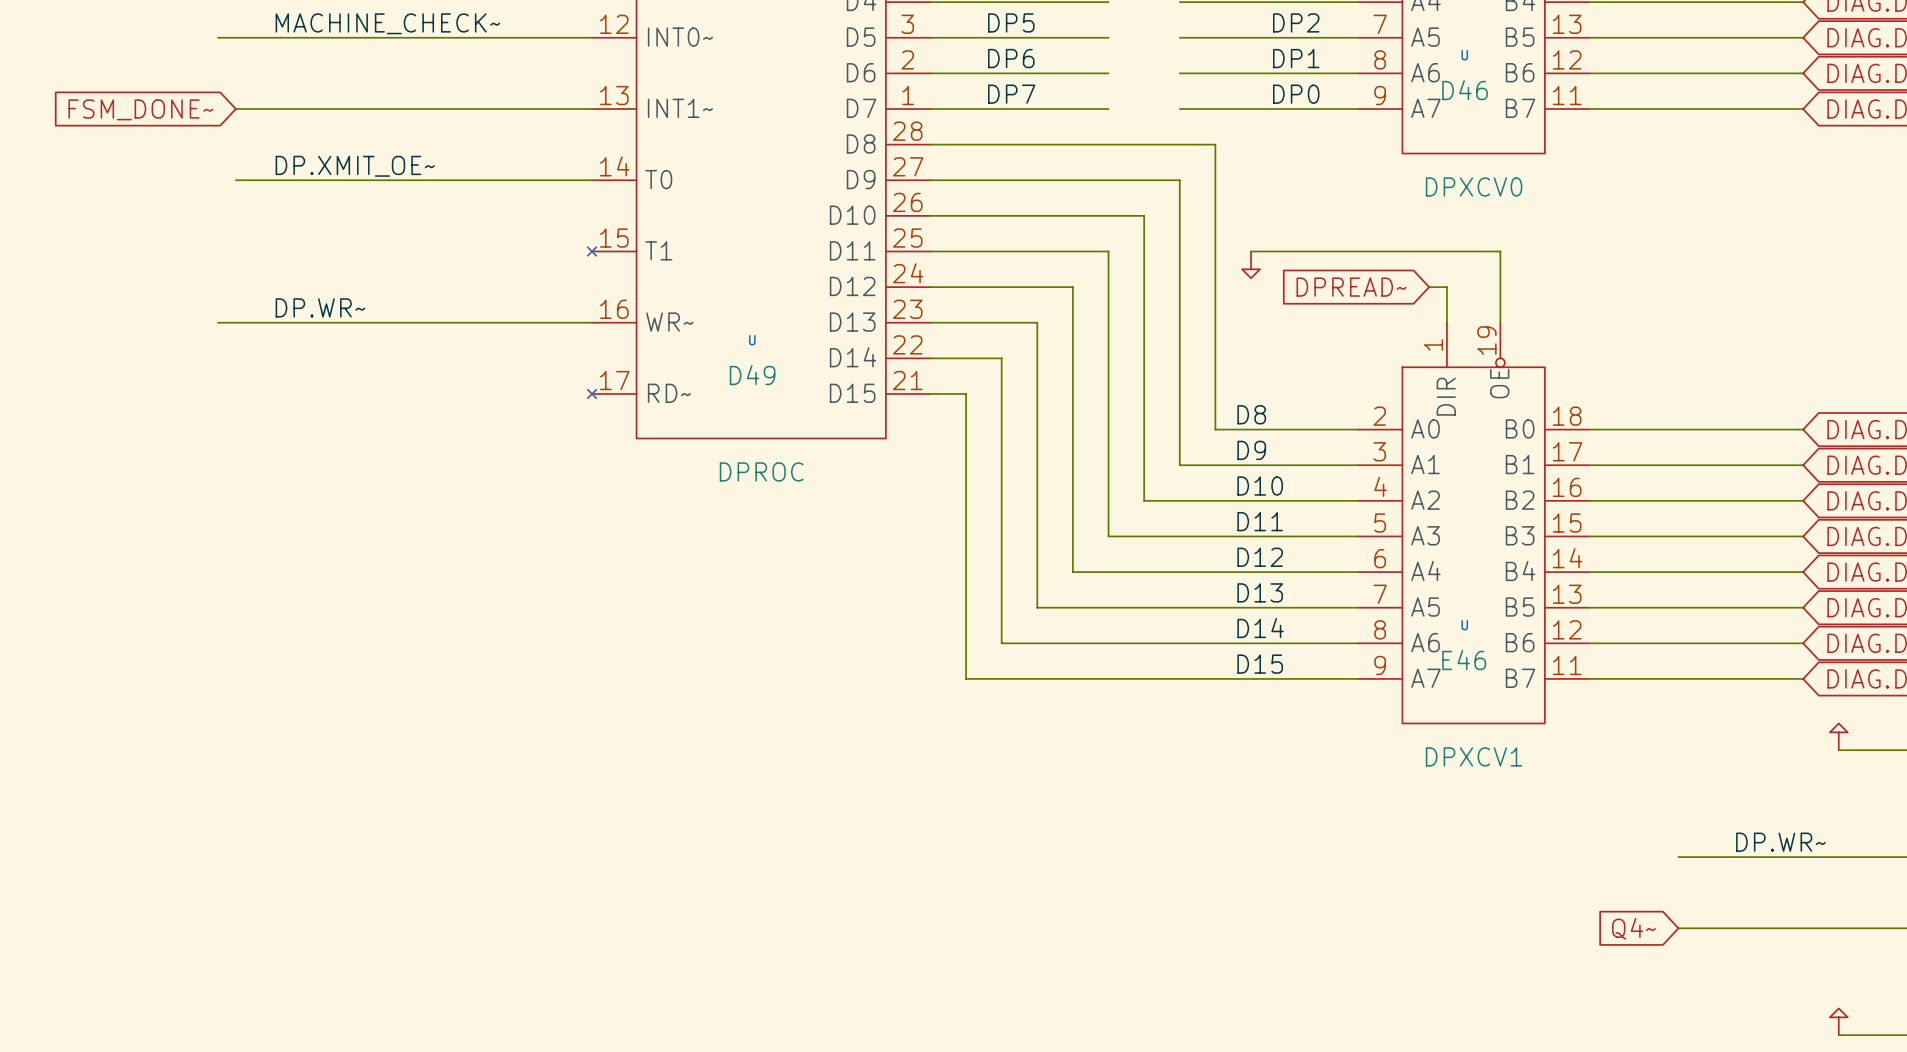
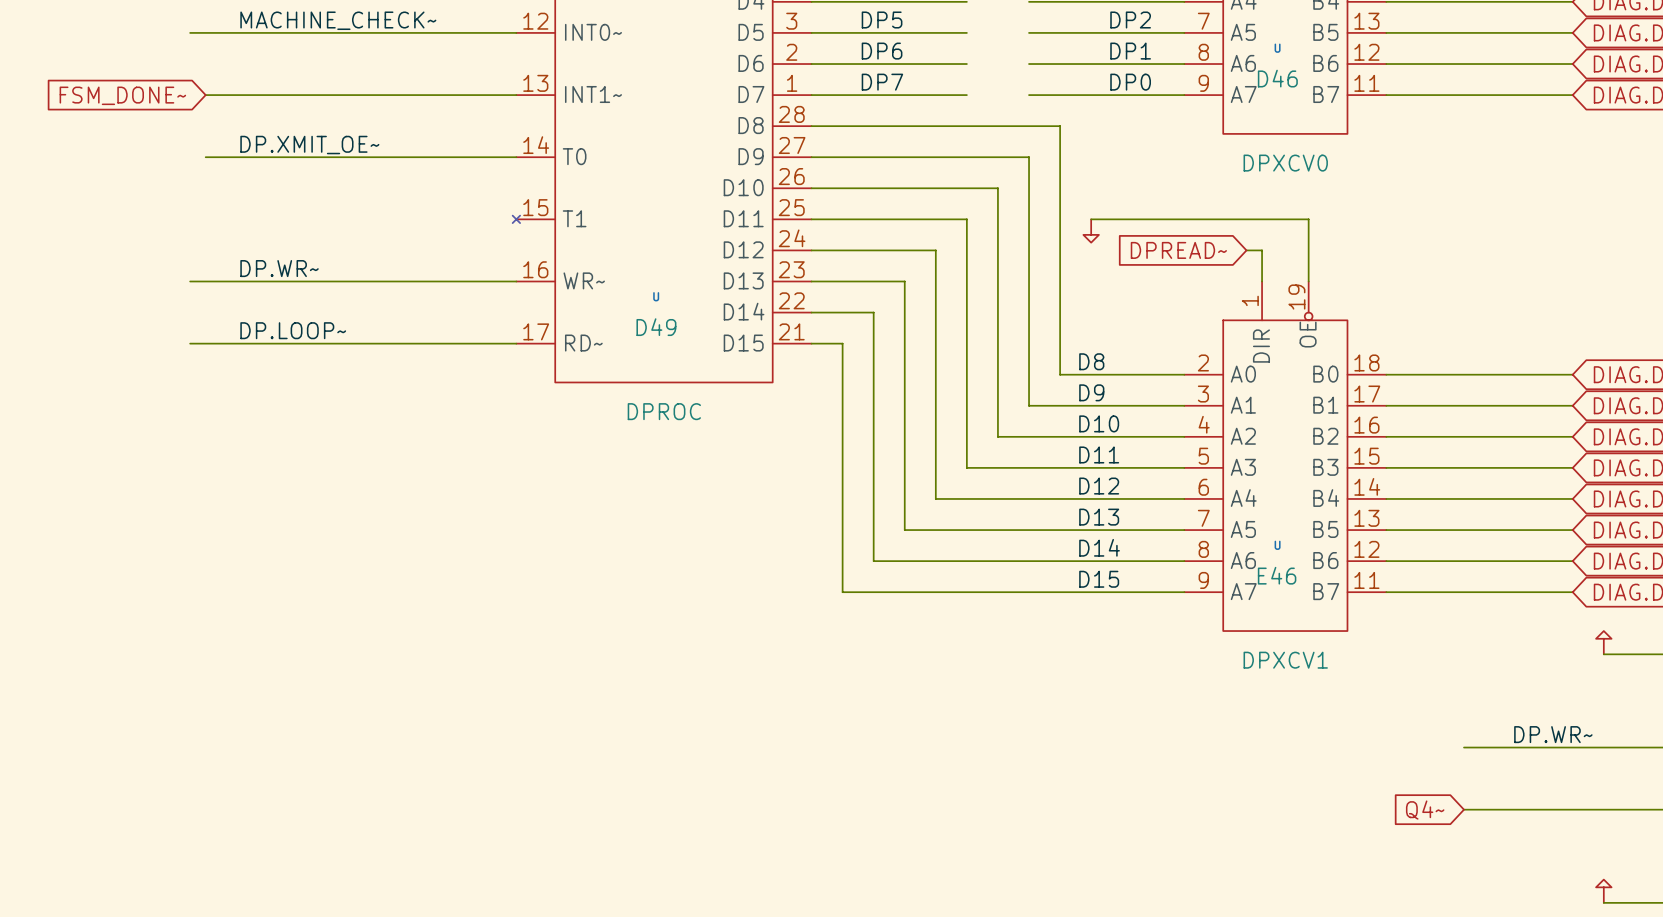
label: none -> DP.LOOP~ (293, 330)
wire: none -> (190, 343) (516, 343)
no-connect mark: (592, 393) -> none

